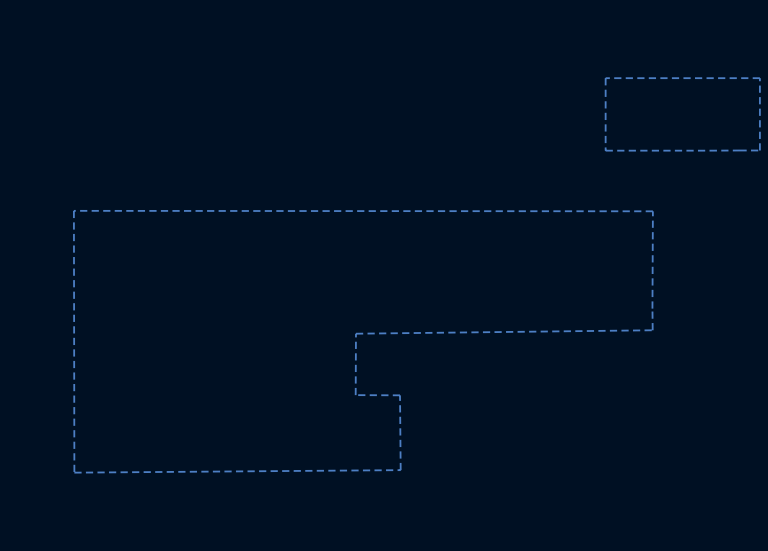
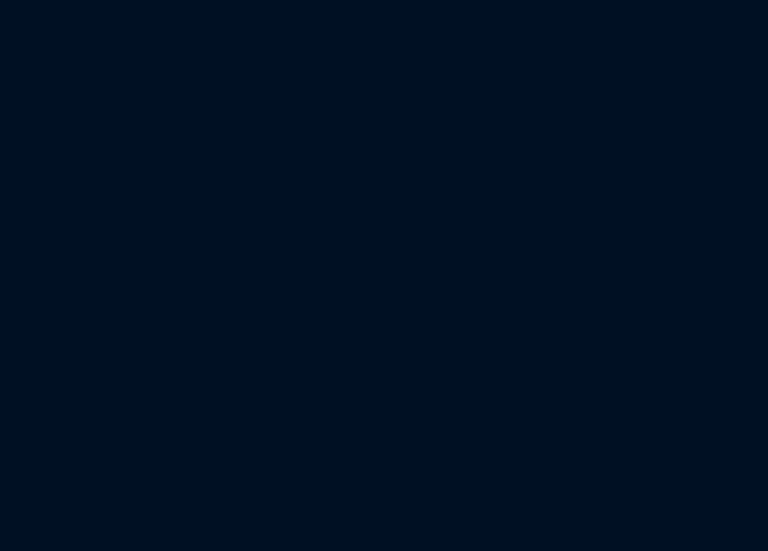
zone outline: (759, 78) (759, 150) (605, 150) (605, 78) (759, 78) -> none
zone outline: (73, 210) (652, 211) (652, 330) (355, 333) (355, 395) (400, 395) (400, 470) (74, 472) (73, 210) -> none

